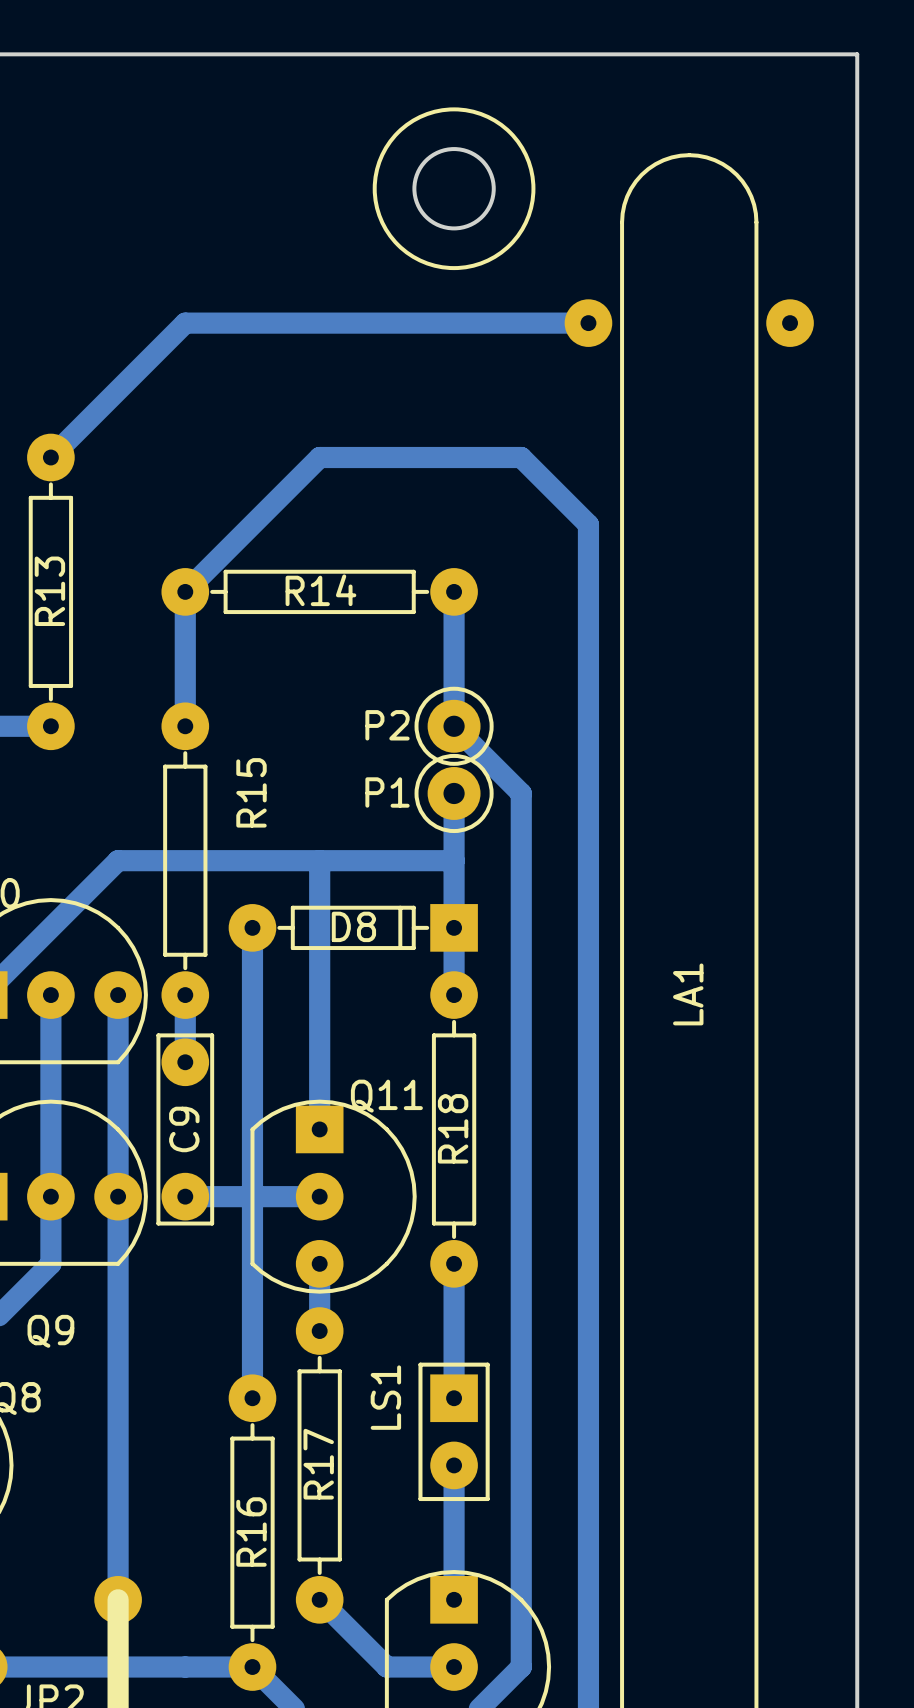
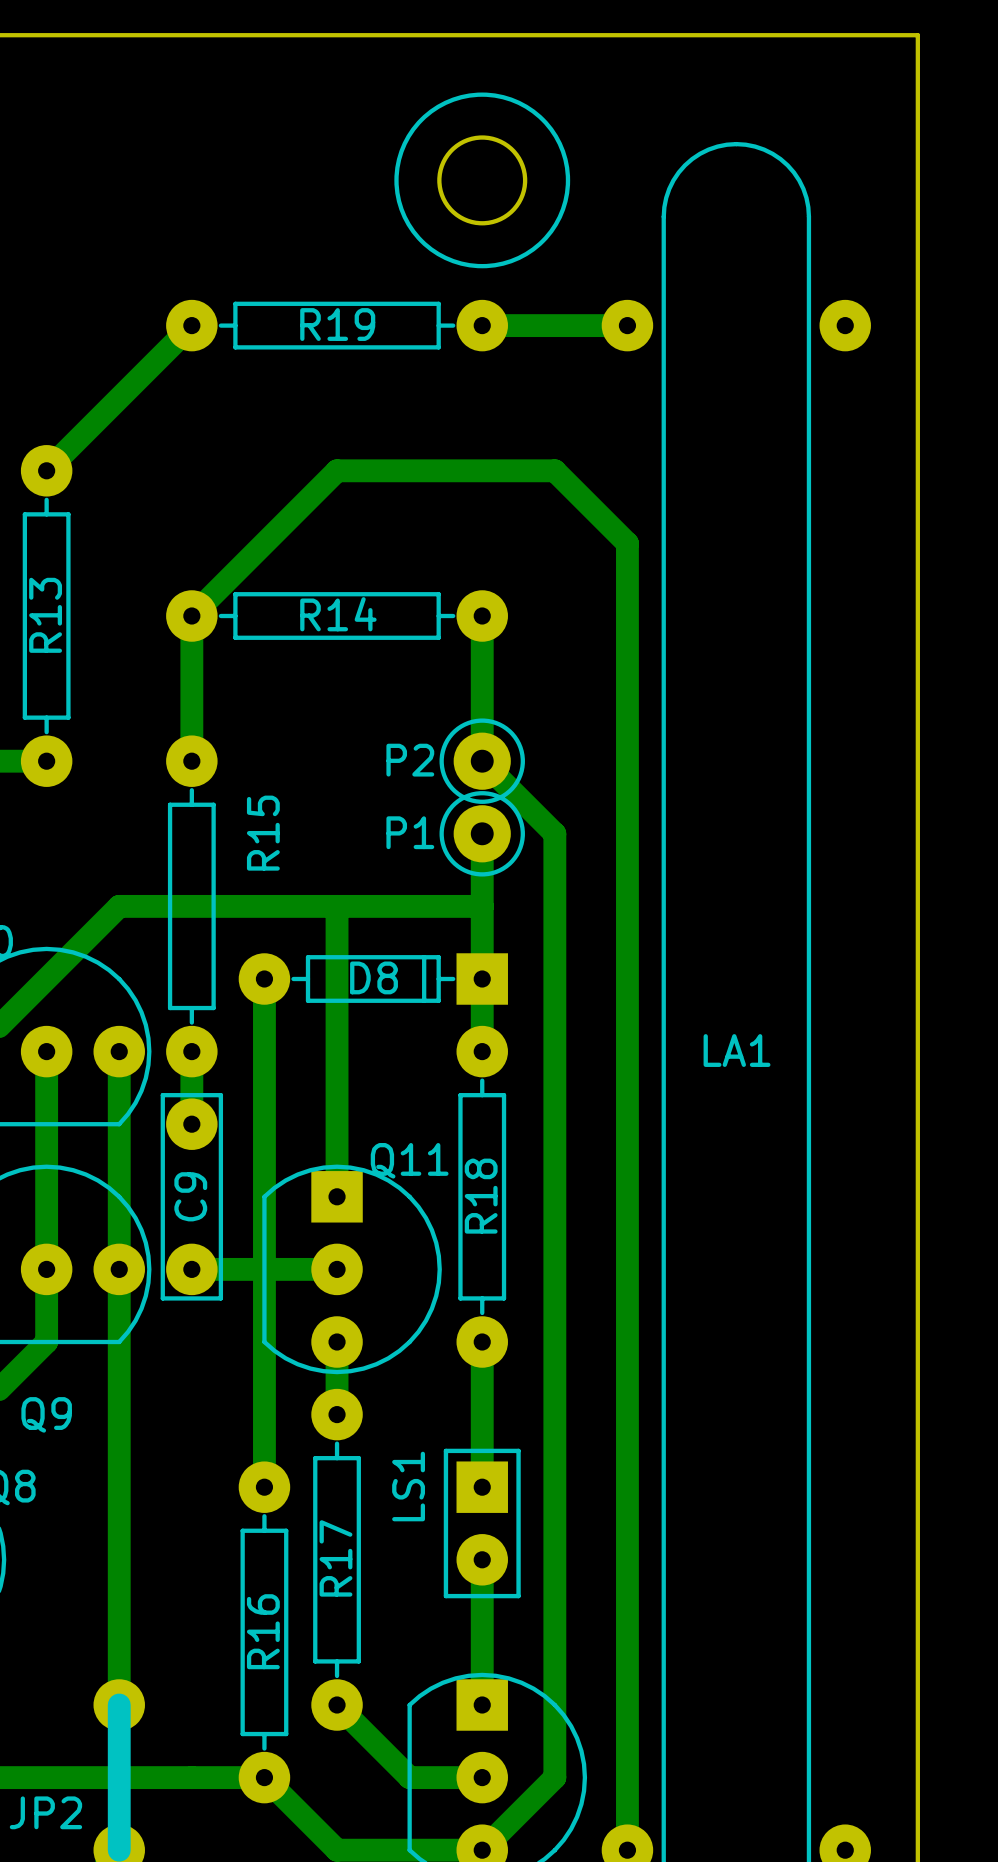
bottom track: (185, 323) (454, 323) -> none
R19: none -> (337, 325)
LA1 name rotation: 0° (688, 994) -> 90° clockwise (737, 1050)

